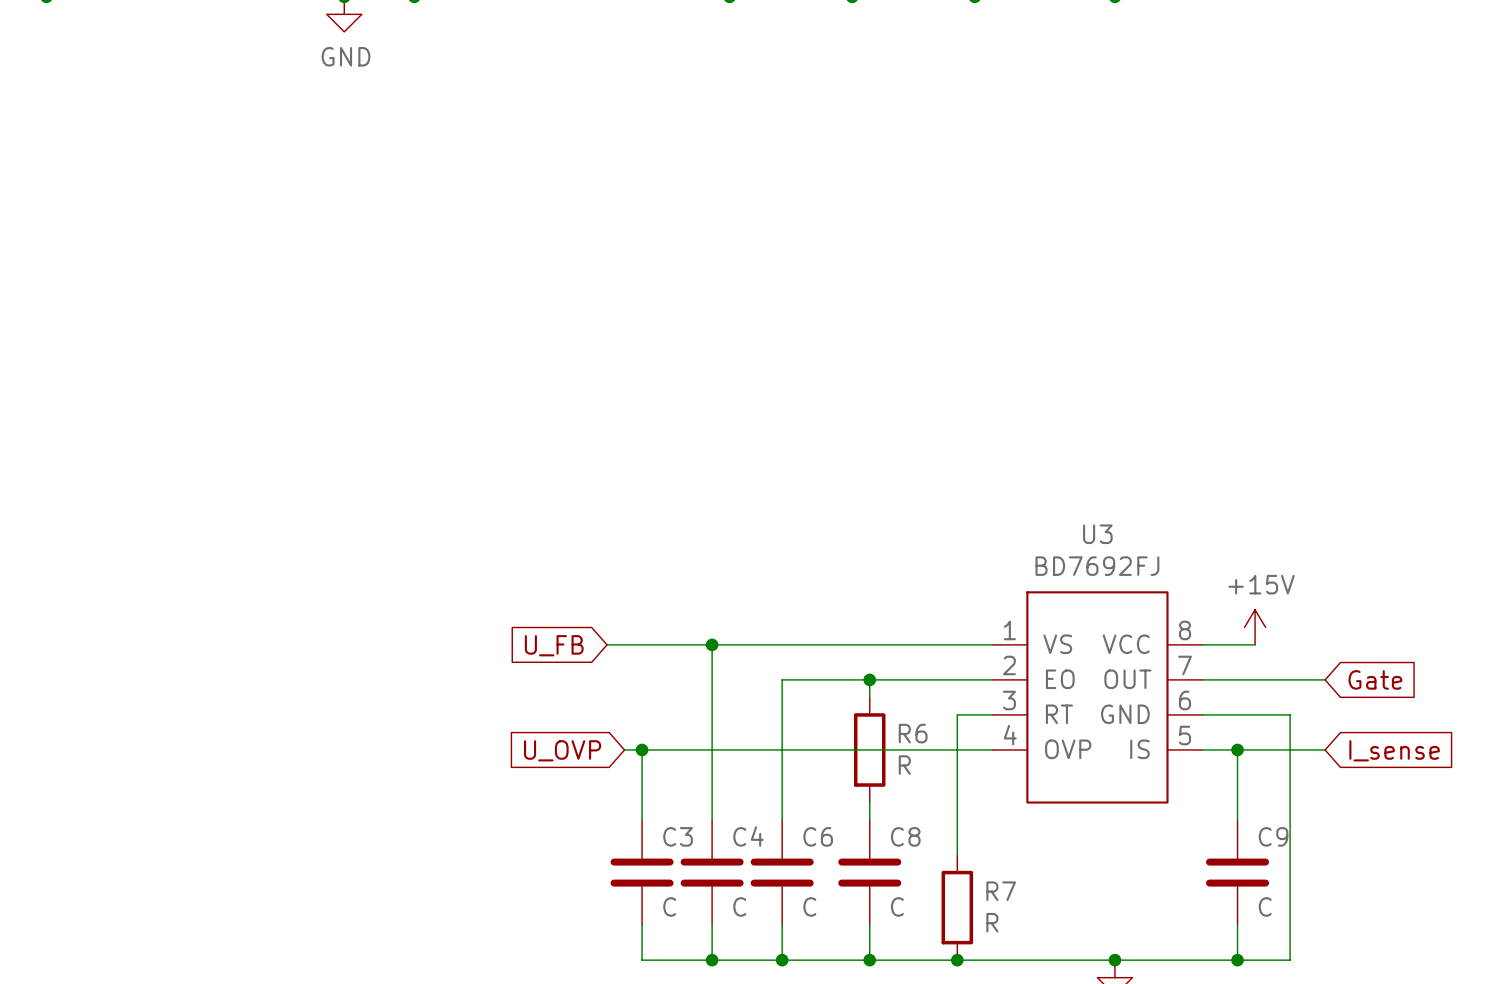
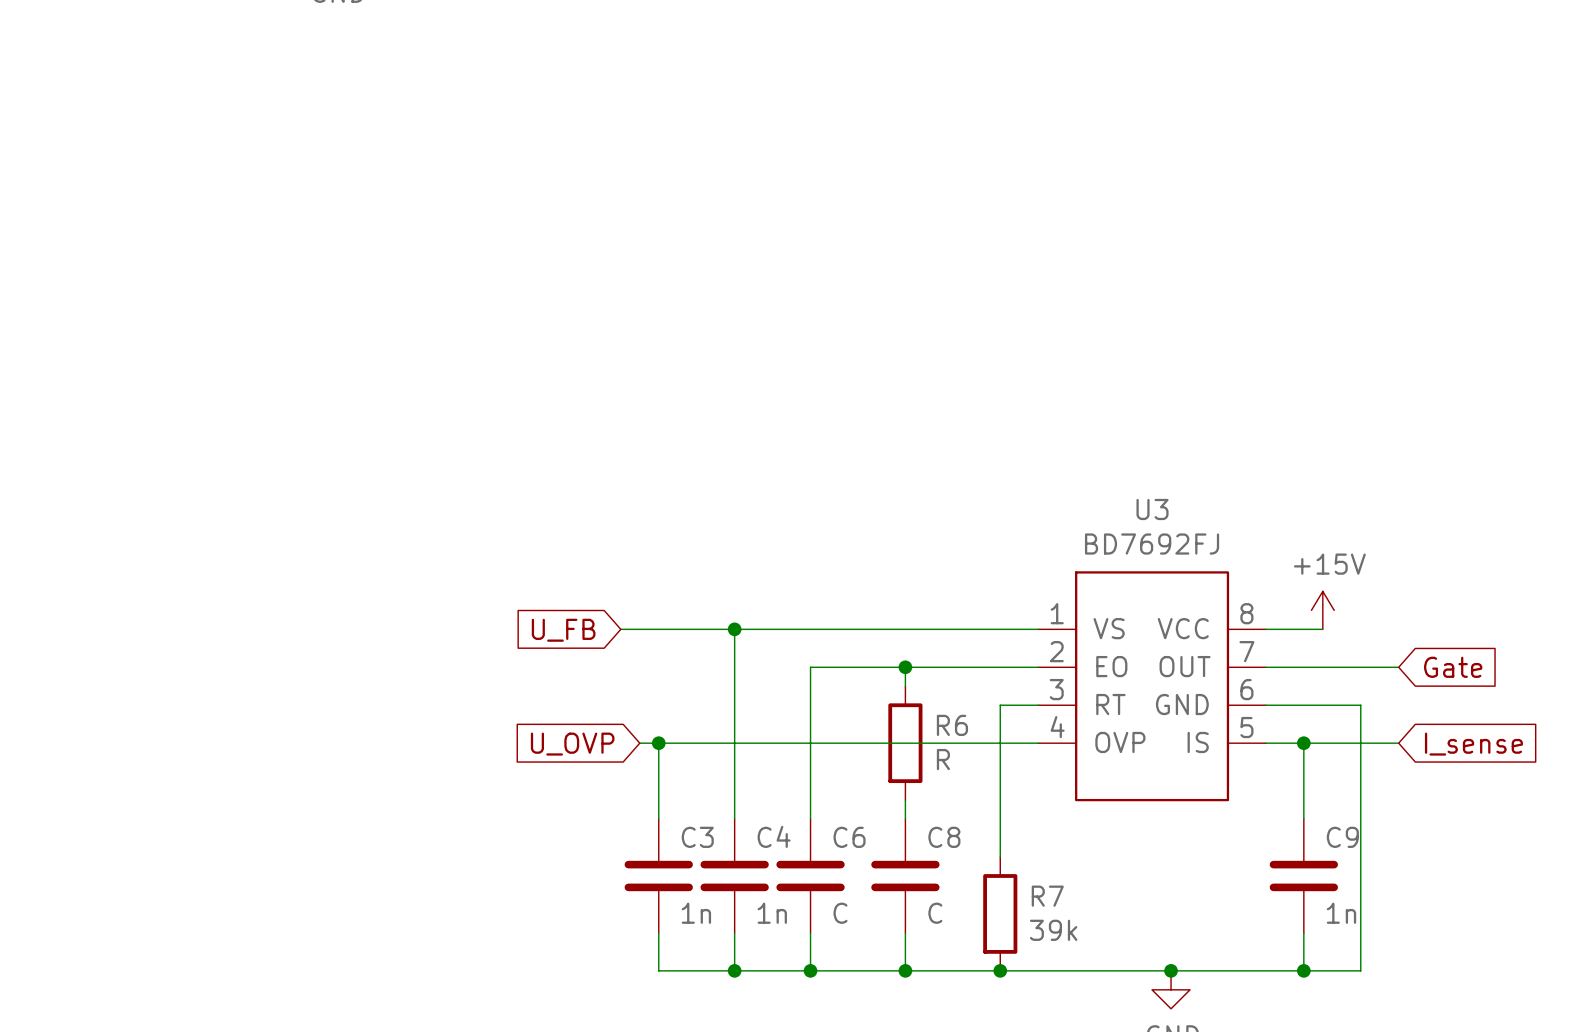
C3 value: C (669, 906) -> 1n (696, 913)
C4 value: C (739, 906) -> 1n (772, 913)
C9 value: C (1265, 906) -> 1n (1341, 913)
R7 value: R (992, 922) -> 39k (1053, 930)

